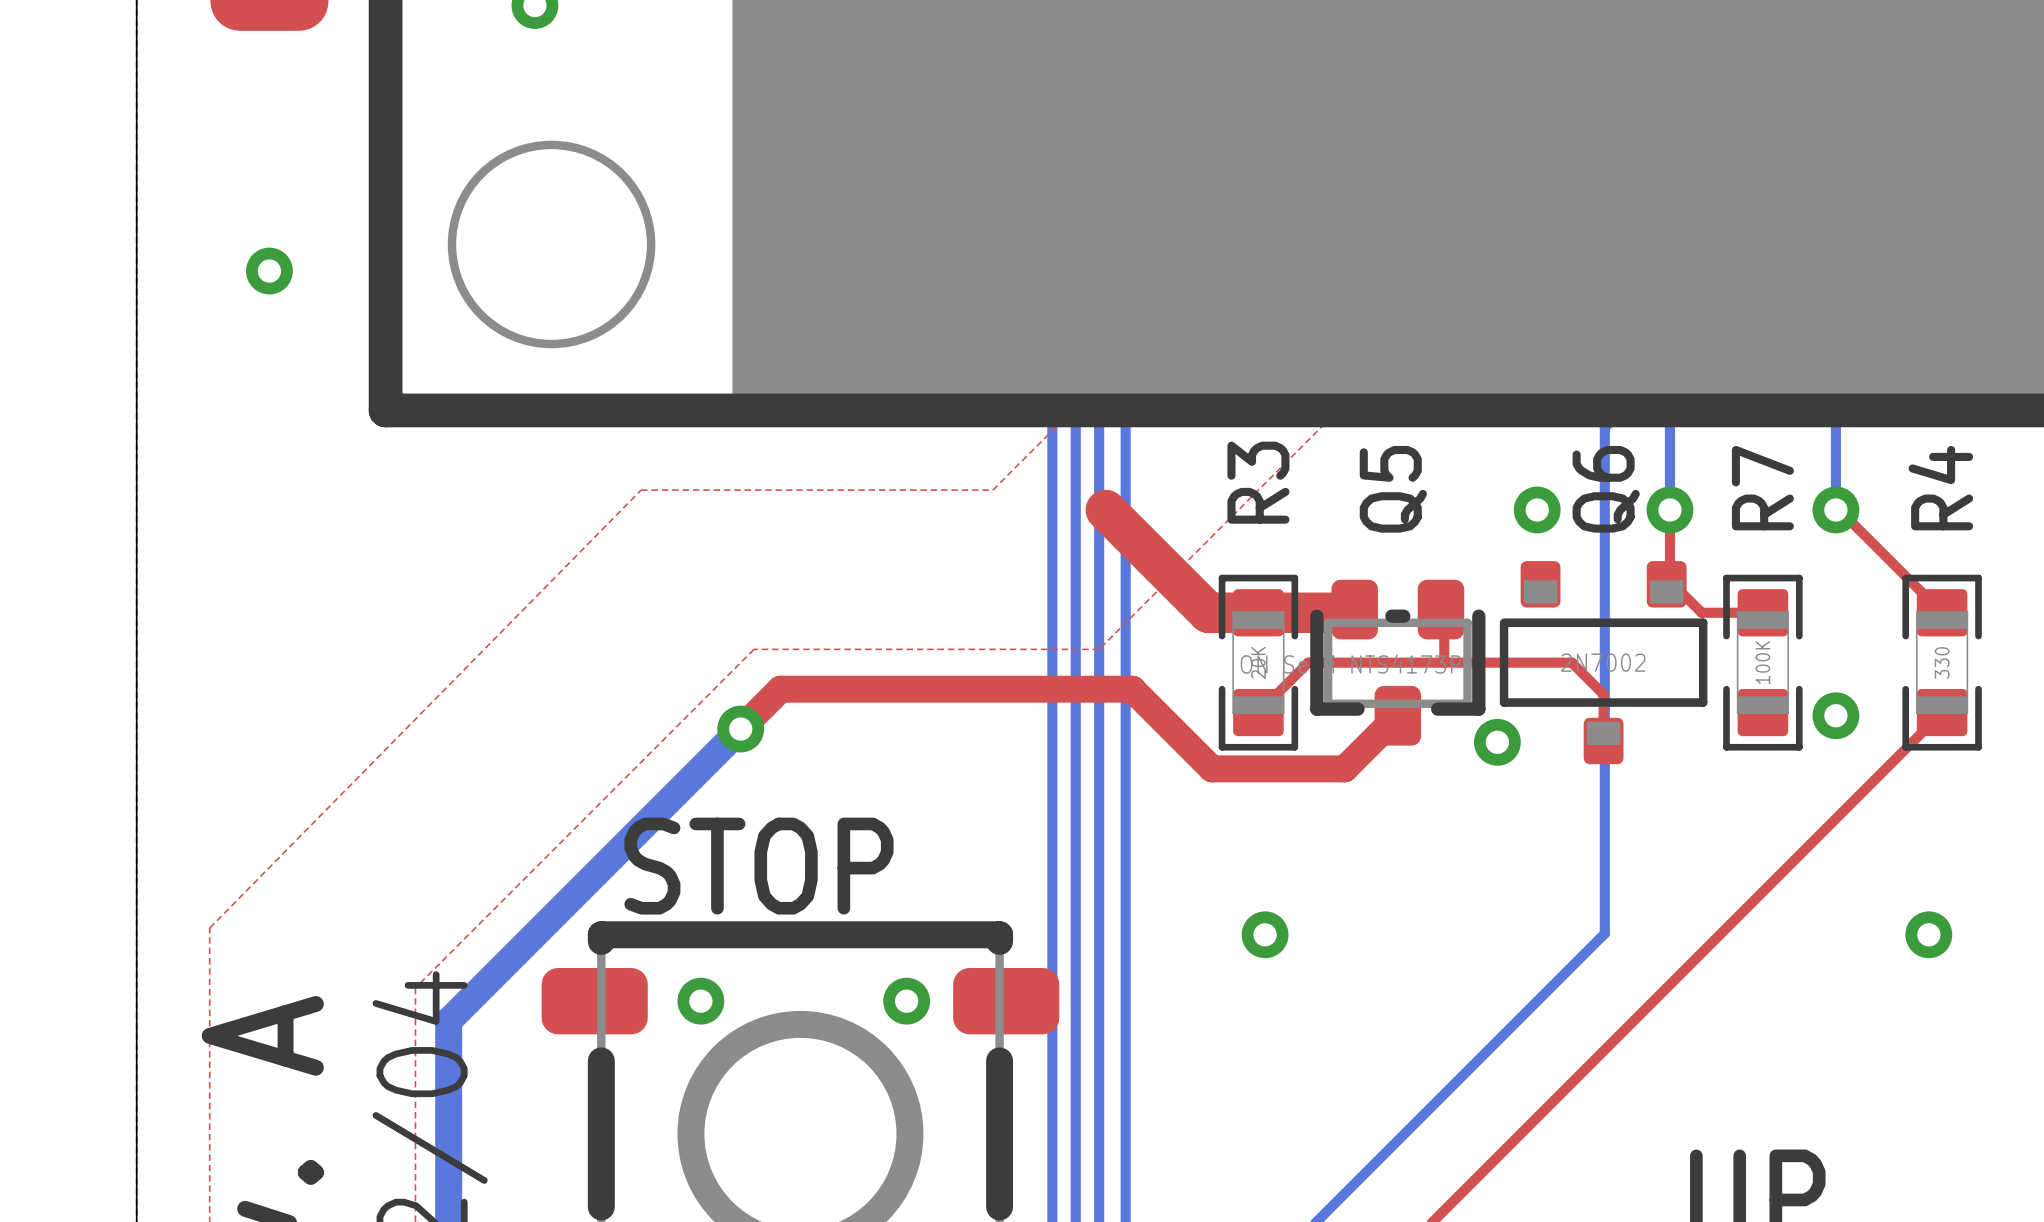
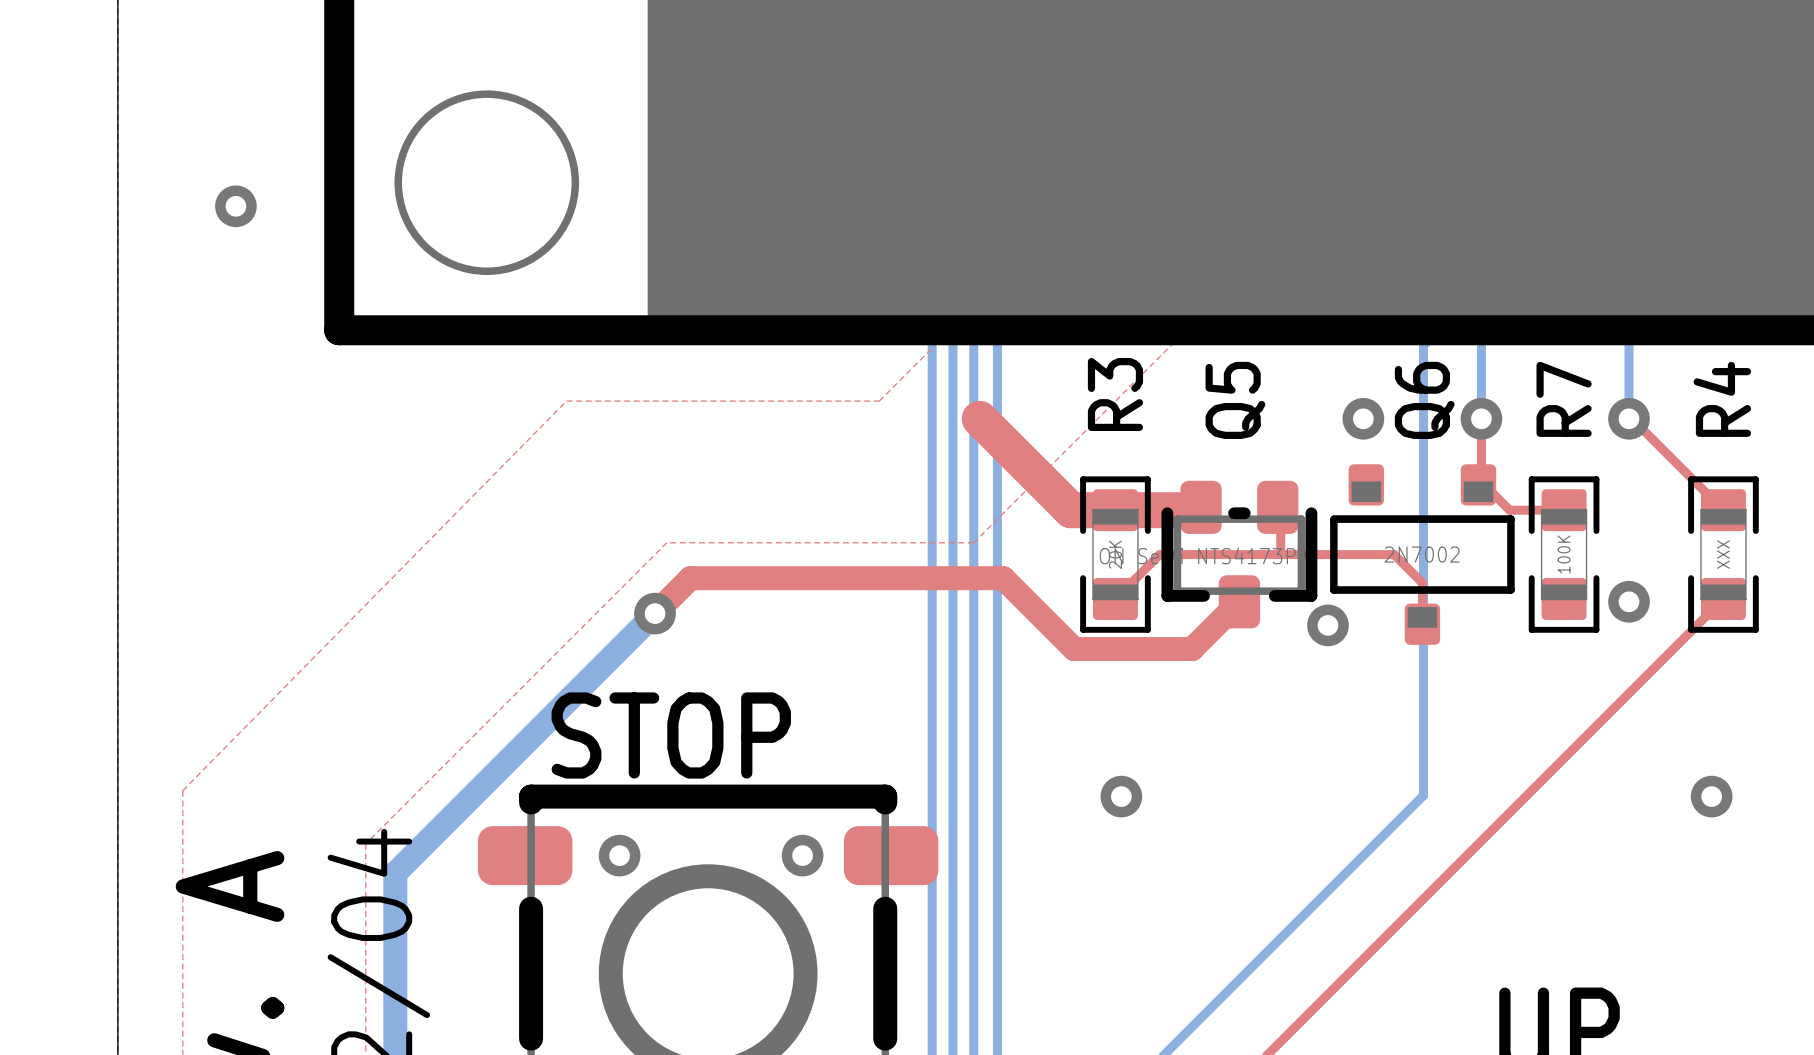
R4 value: 330 (1942, 662) -> XXX (1723, 554)

